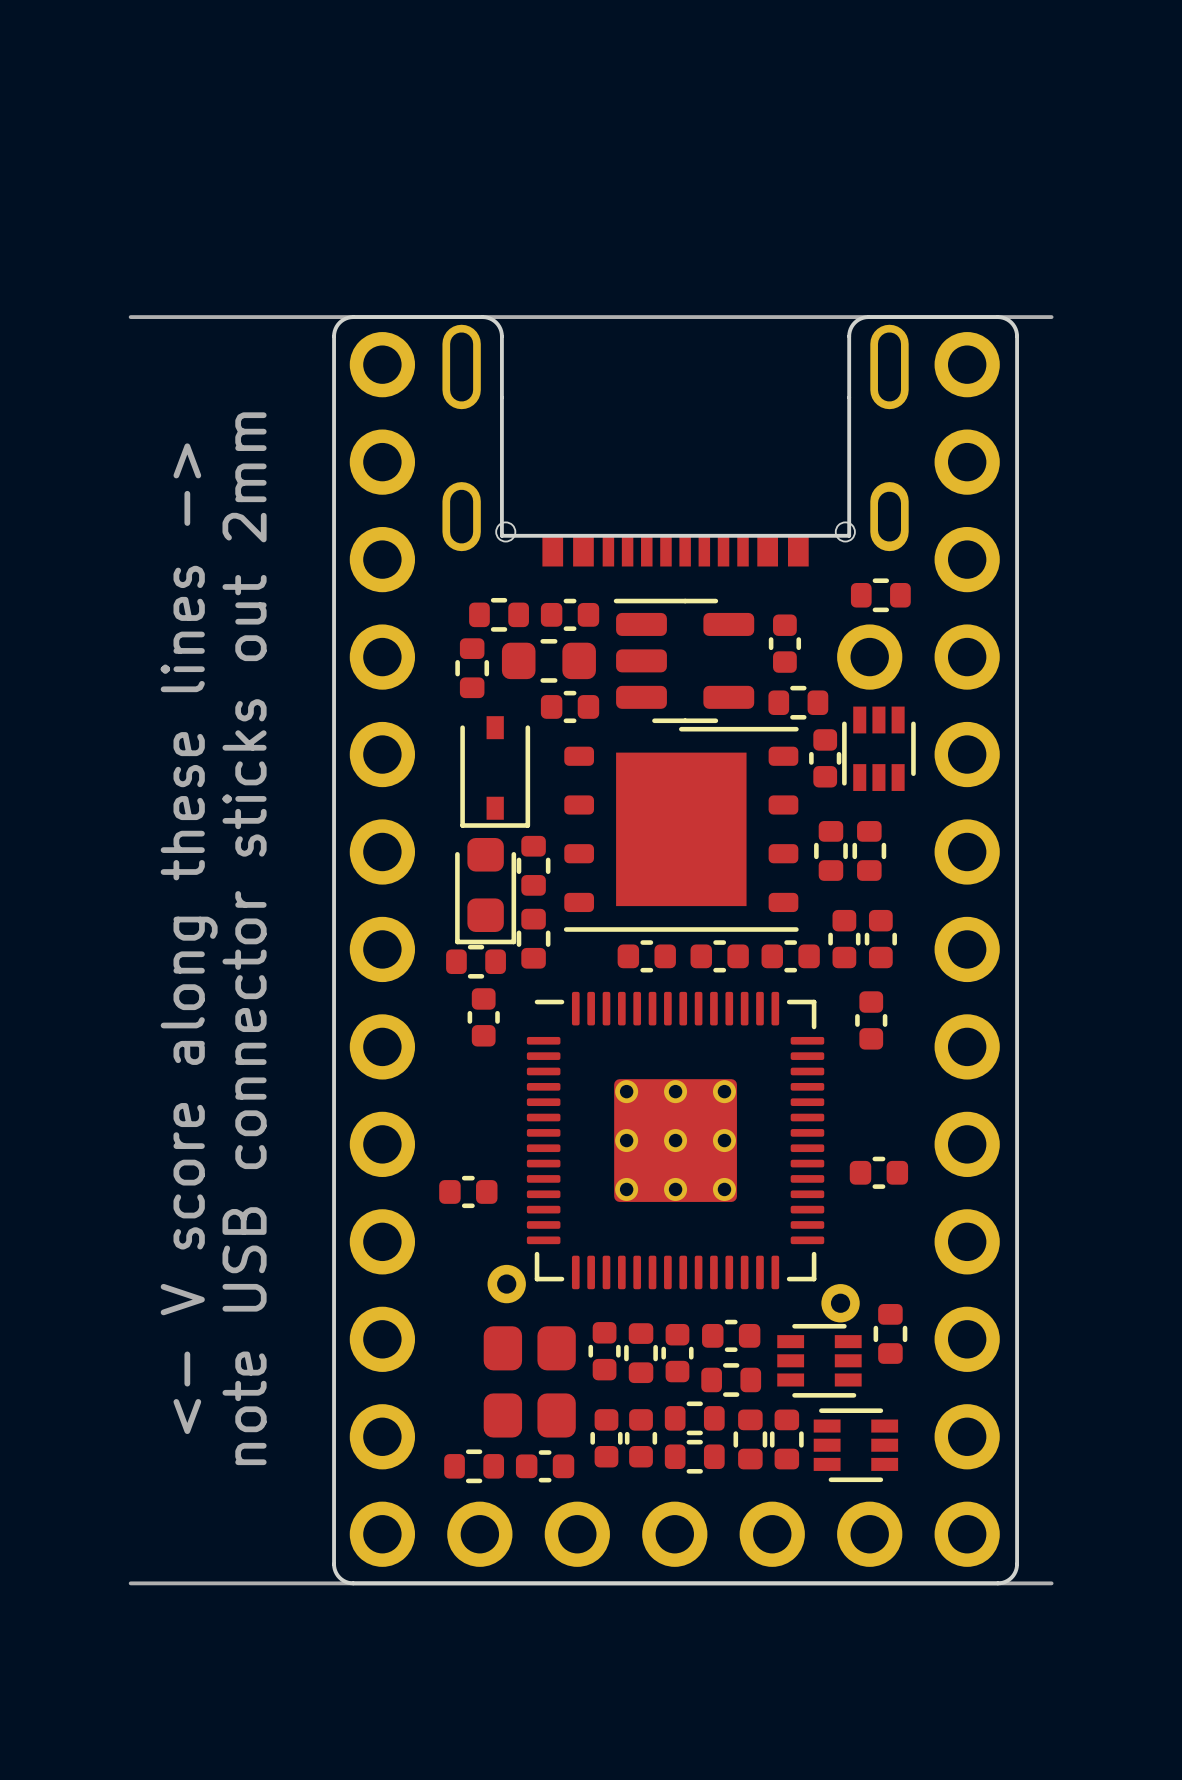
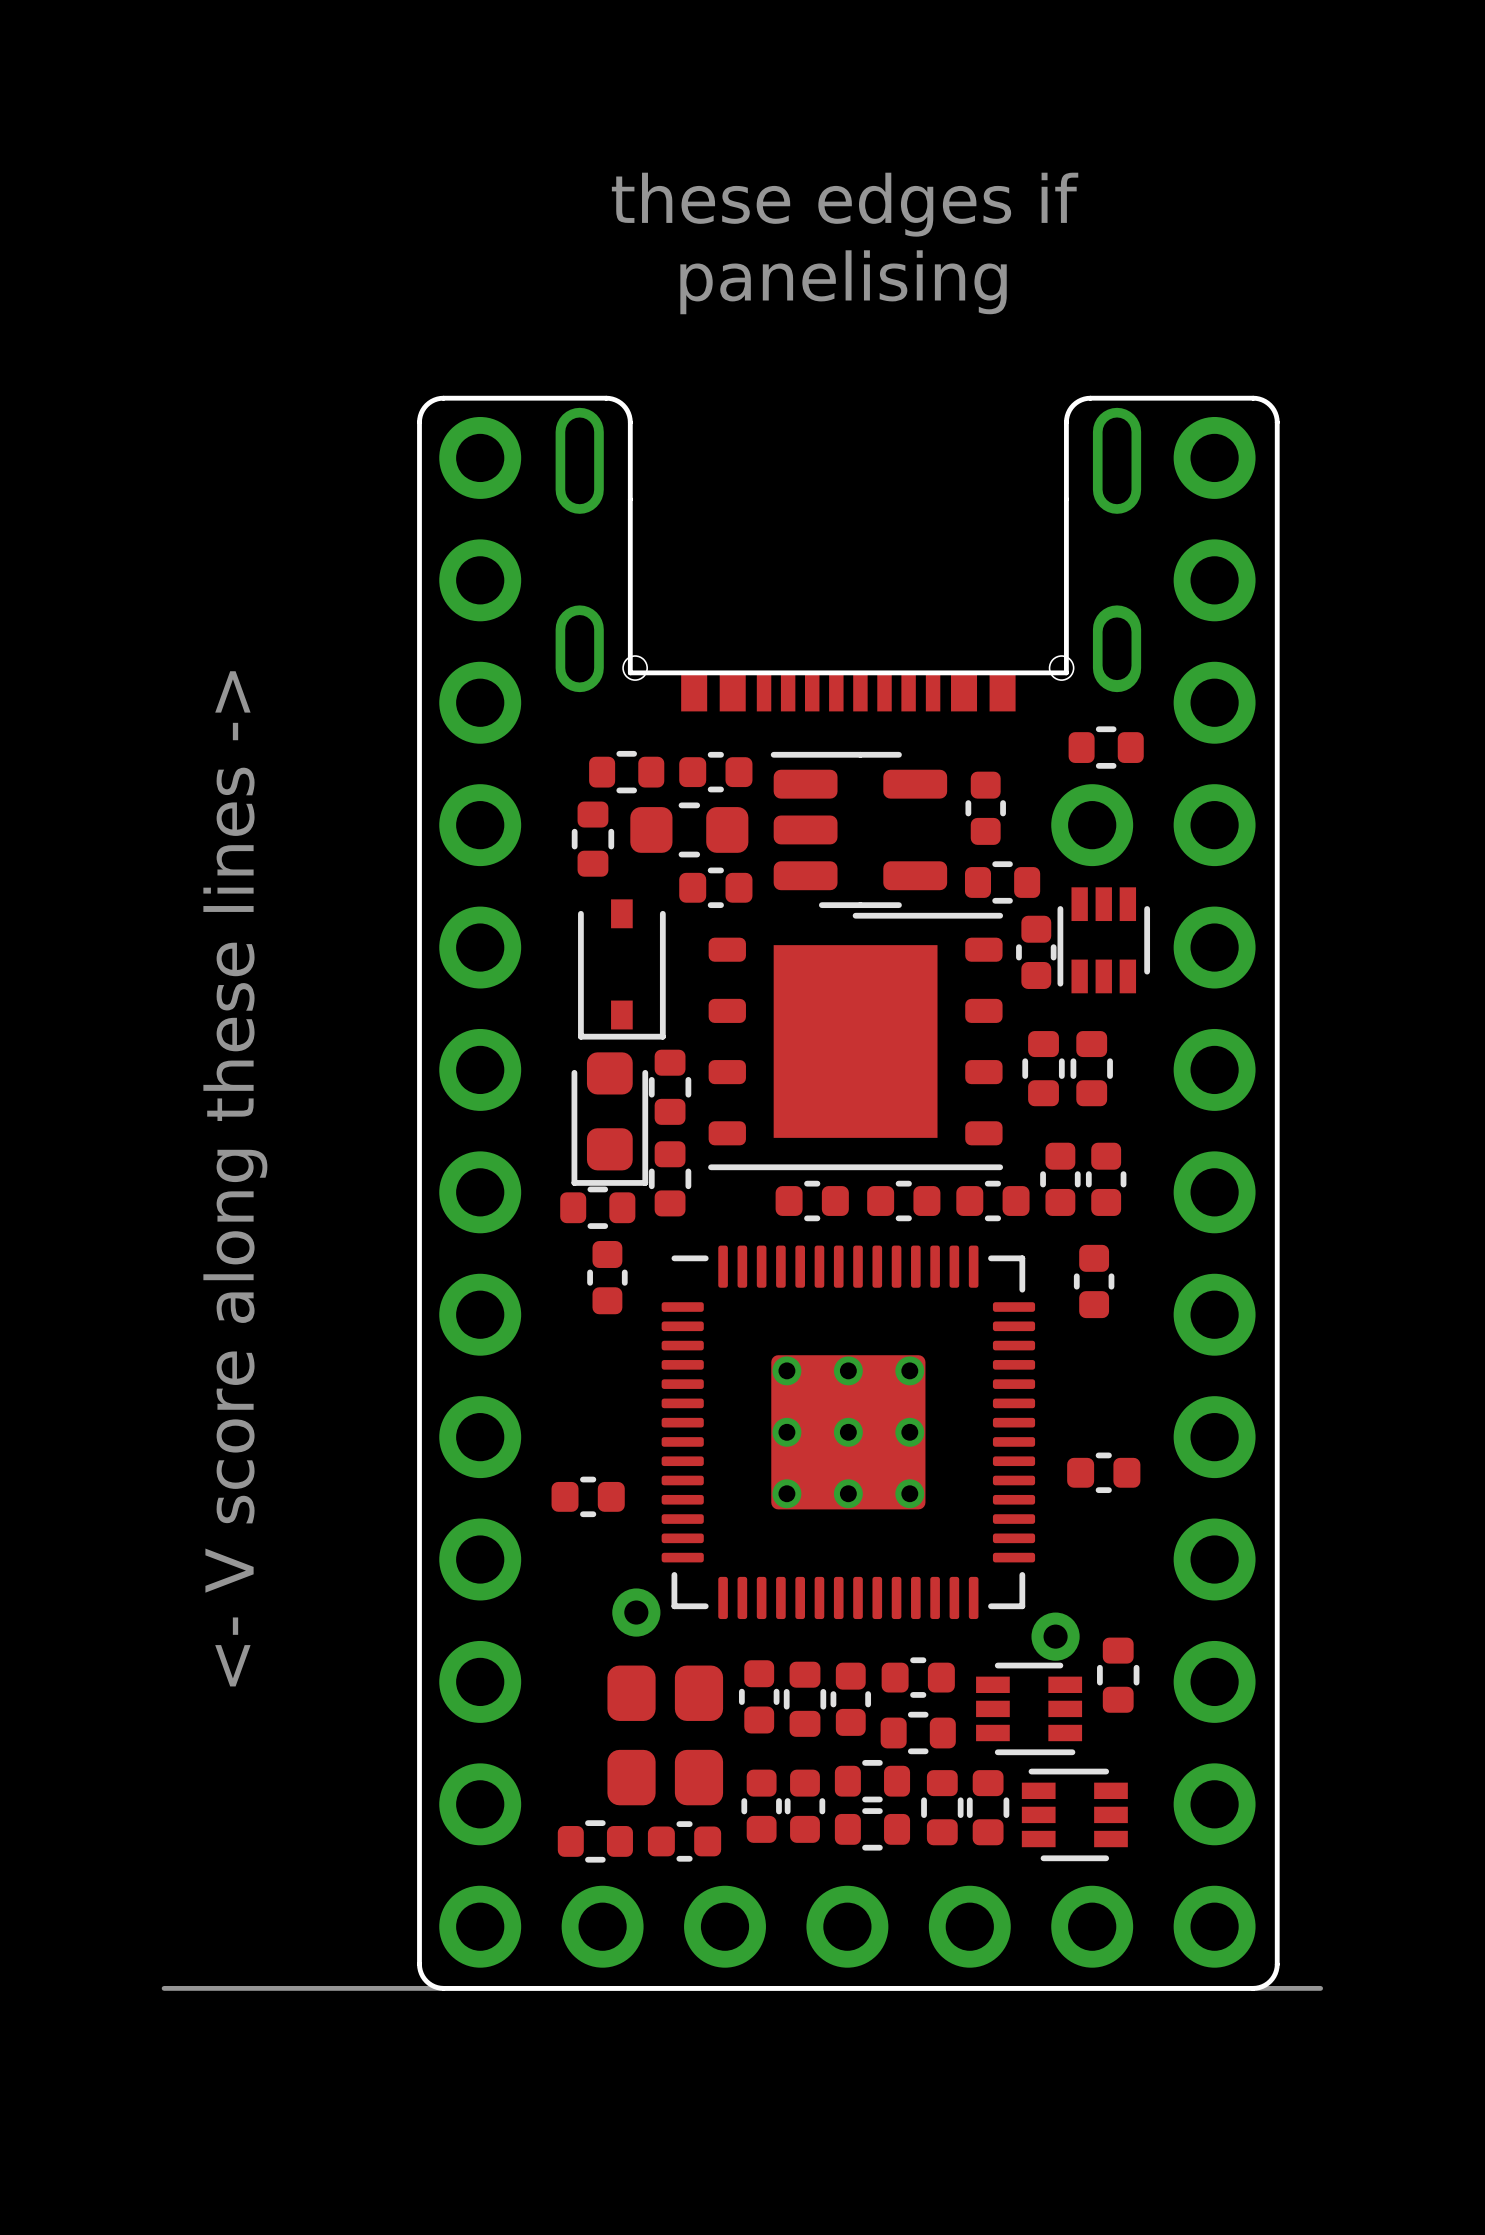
text: none -> these edges if (845, 204)
text: none -> panelising (843, 282)
line: (130, 317) (1051, 317) -> none
text: note USB connector sticks out 2mm (244, 938) -> none

